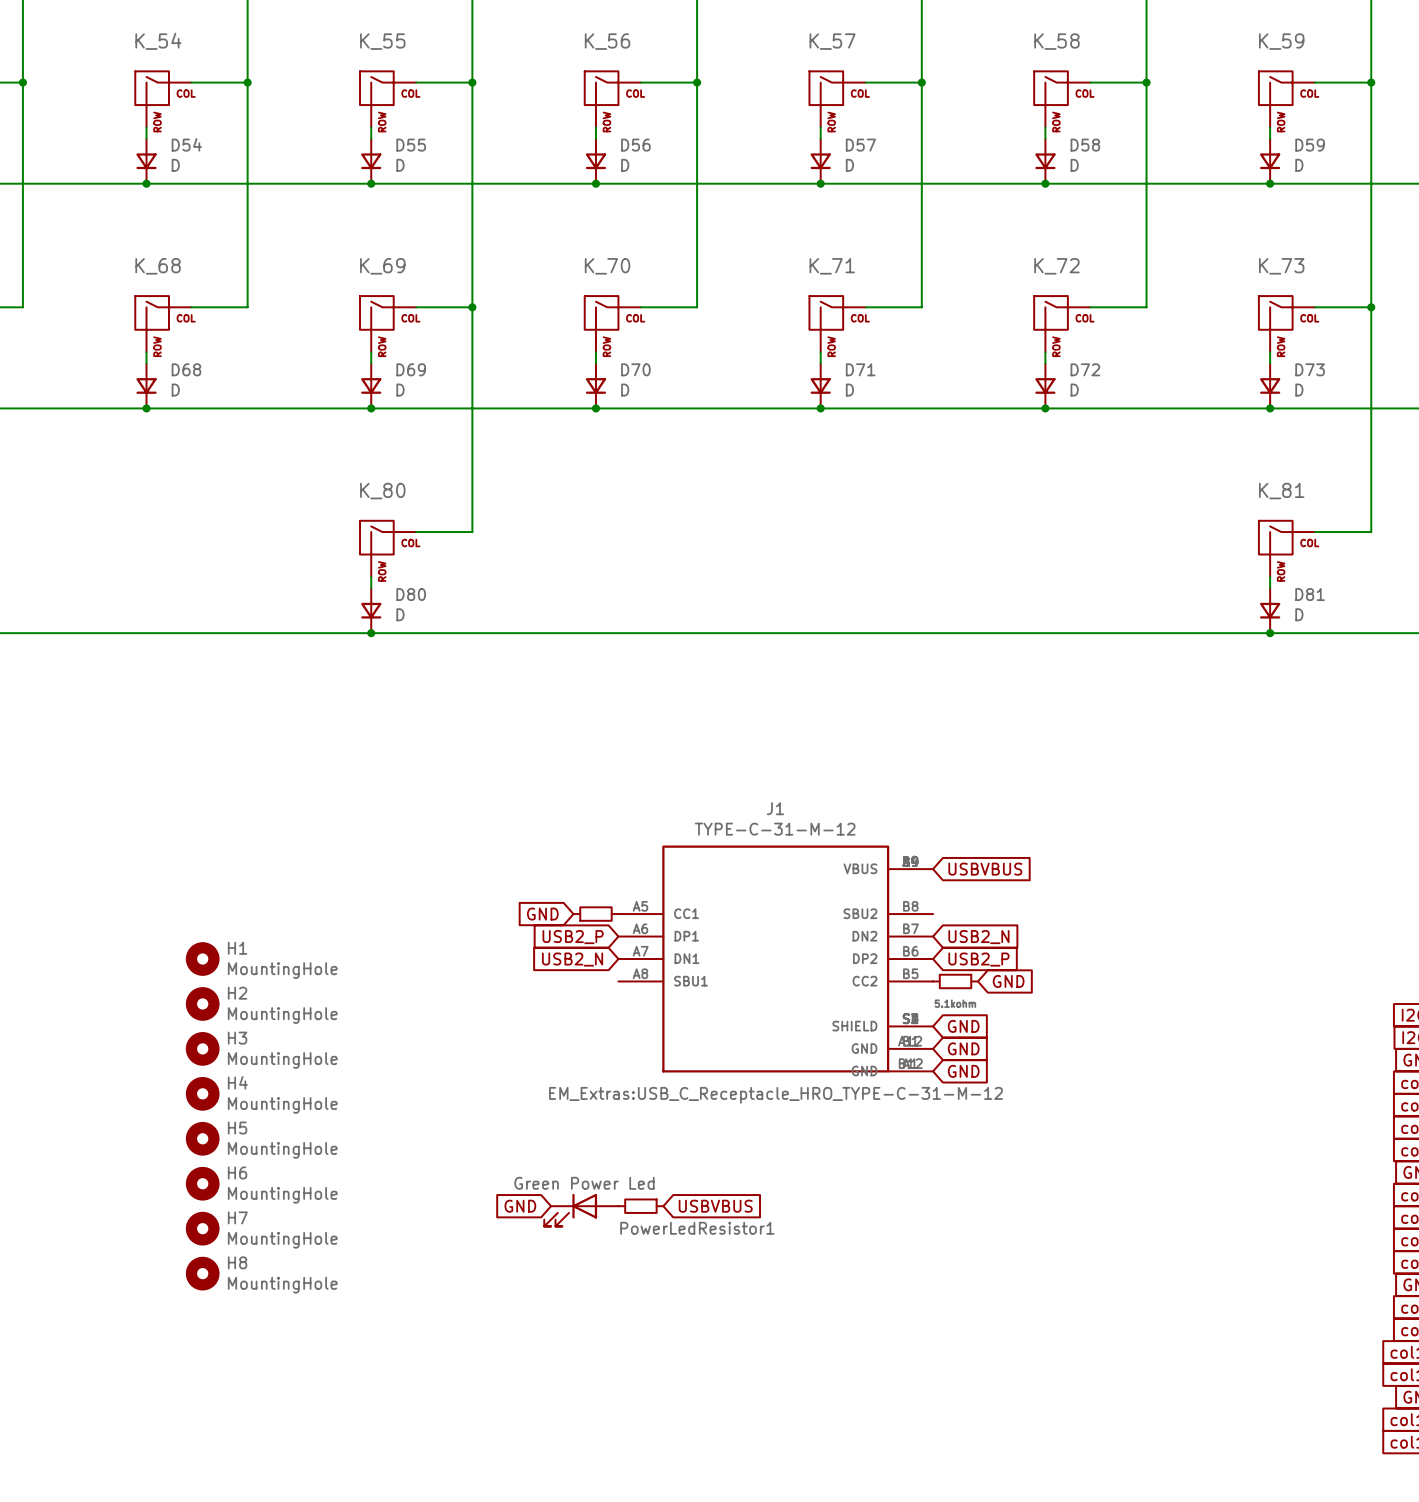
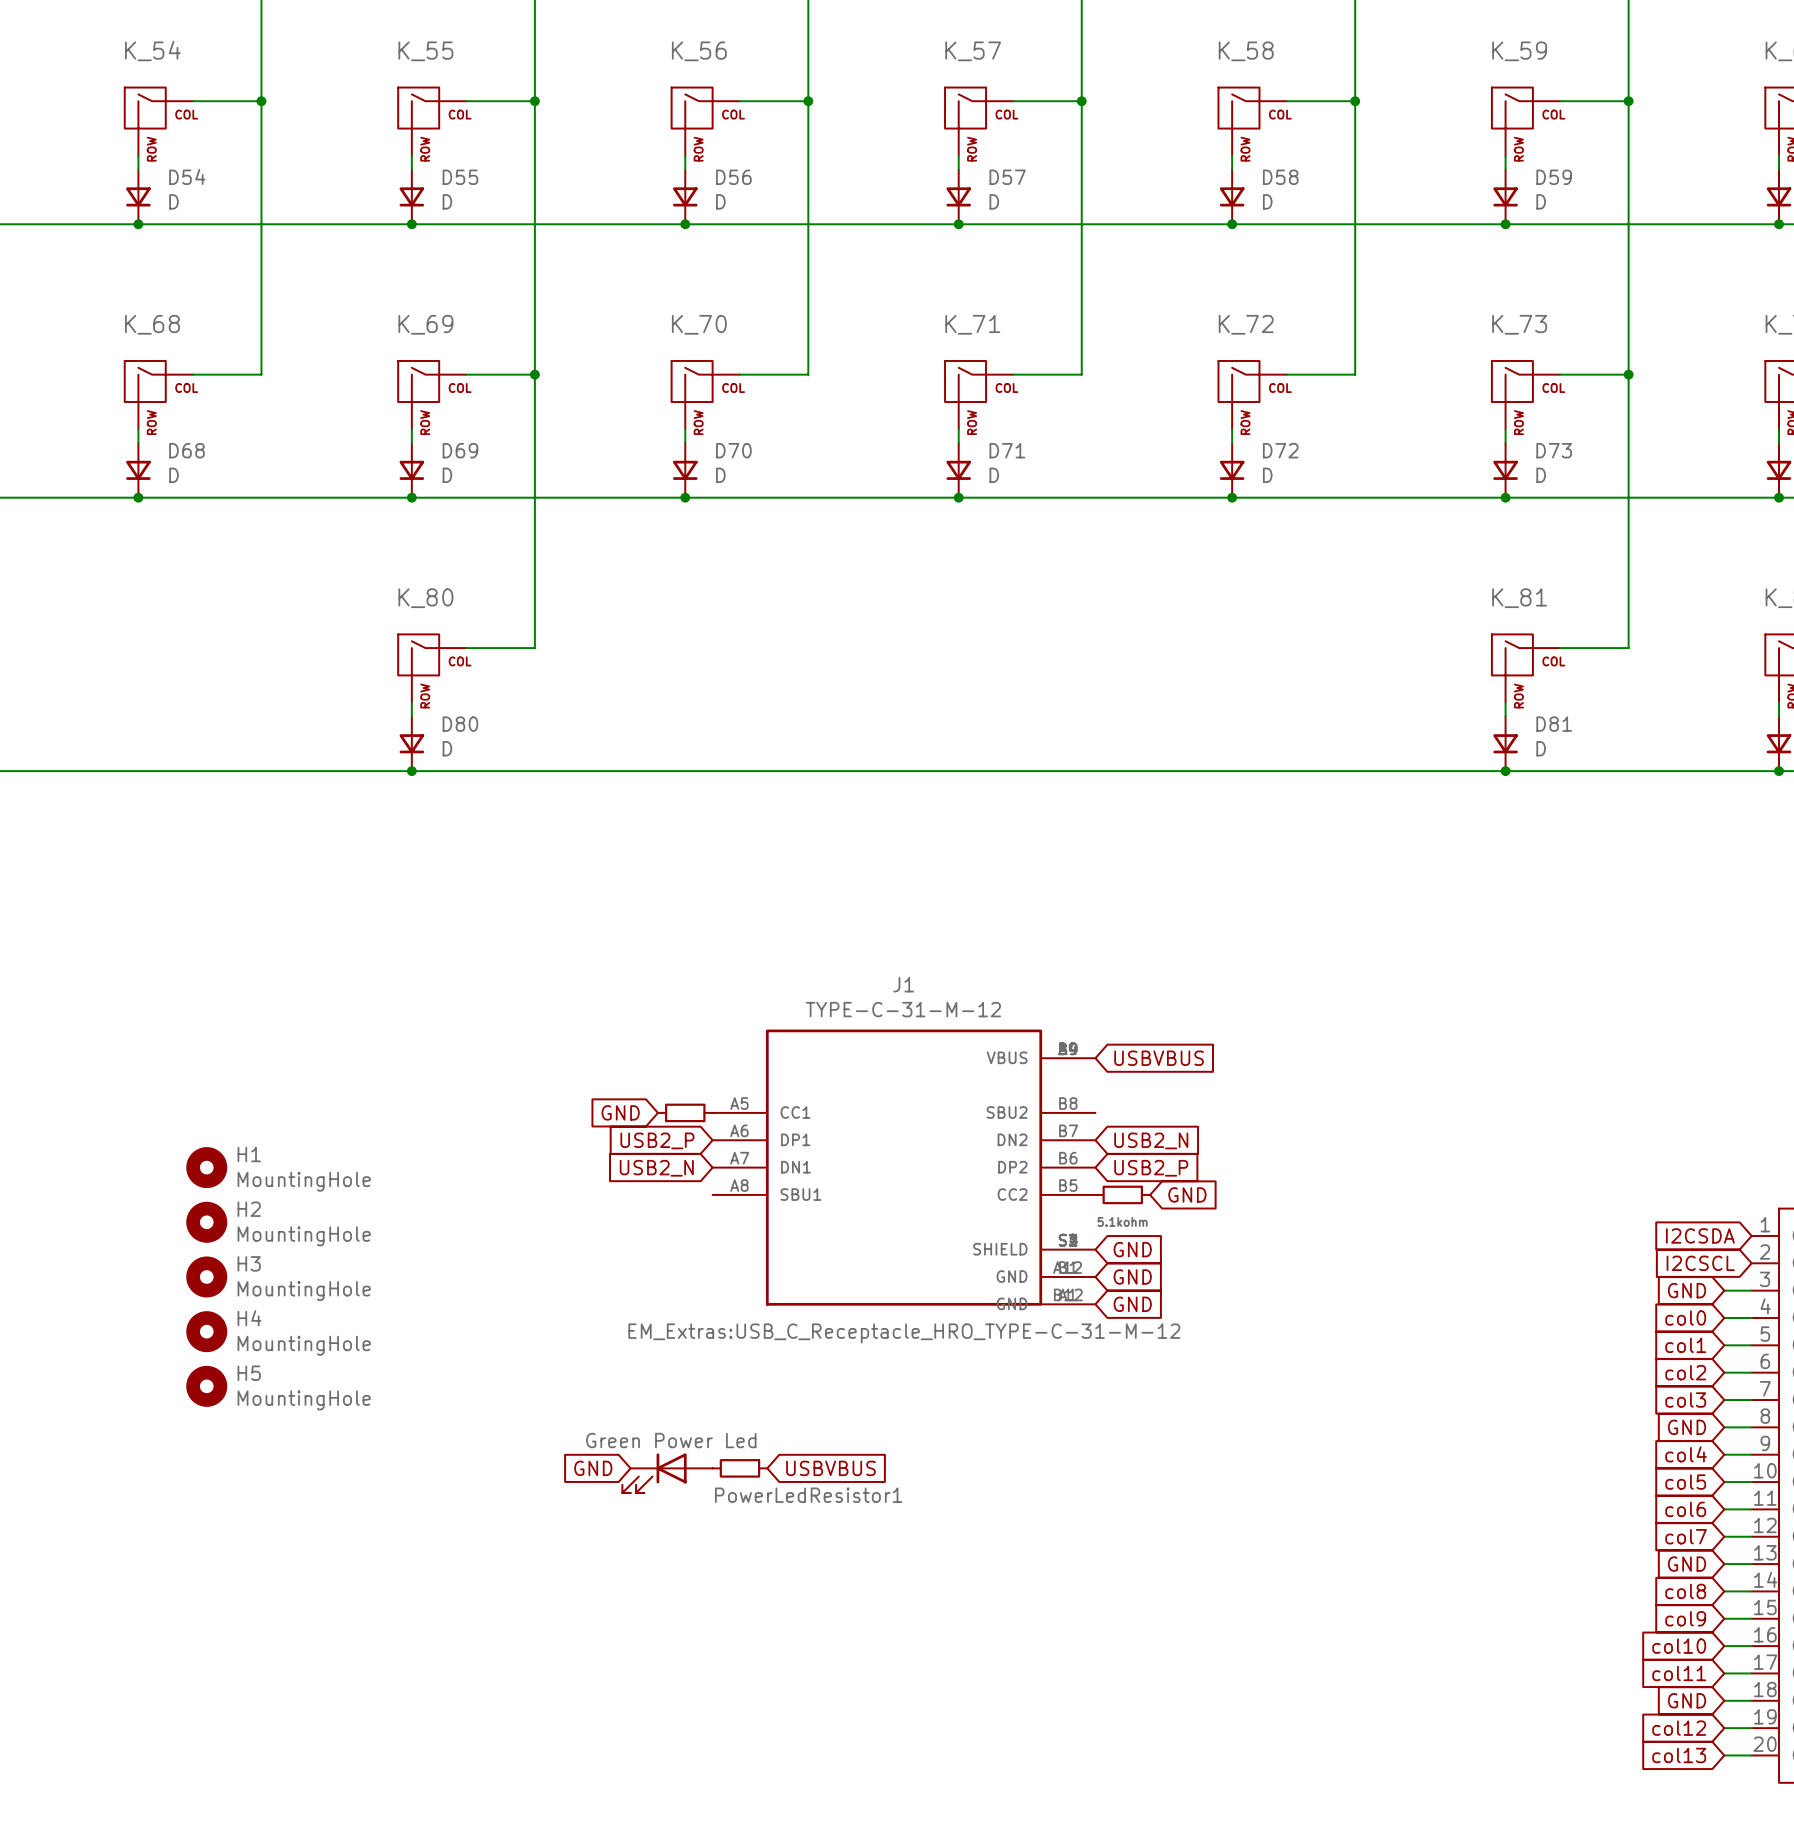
H6: MountingHole (202, 1183) -> none
H7: MountingHole (202, 1228) -> none
H8: MountingHole (202, 1273) -> none

